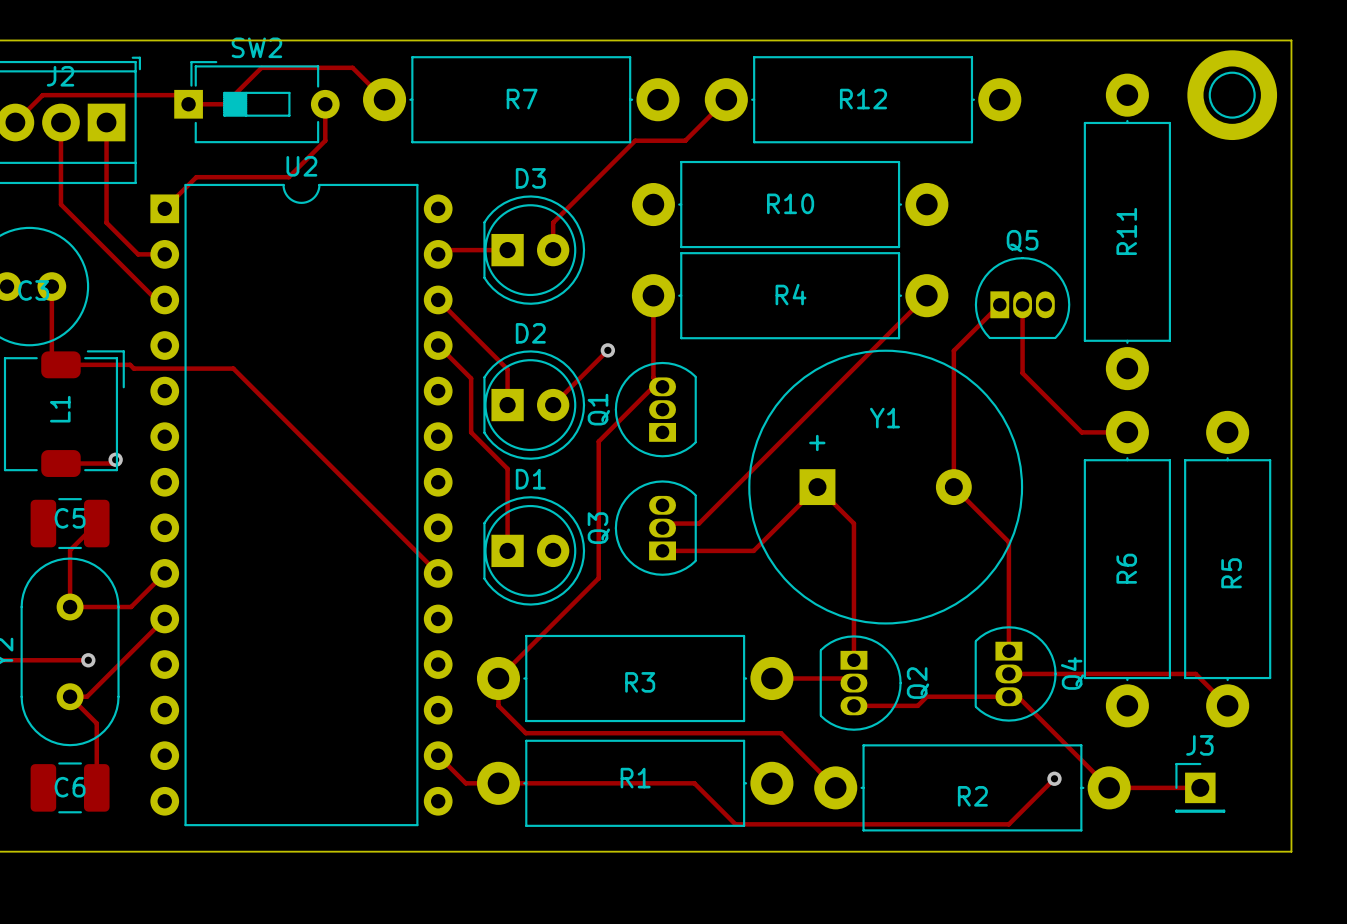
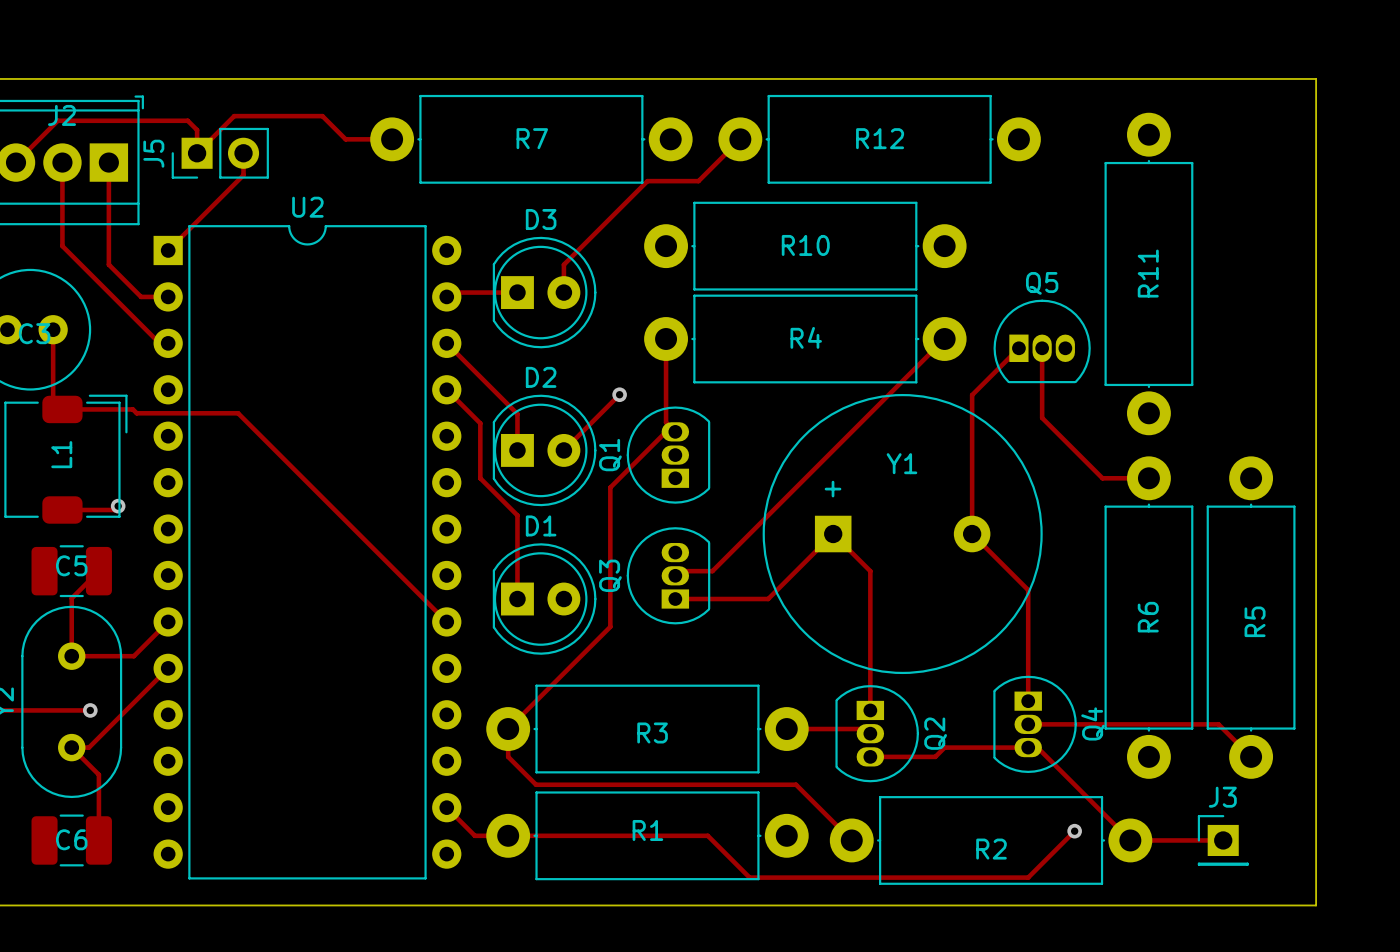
track: (42, 95) (179, 95) (188, 104) (225, 104) (261, 67) (352, 67) (384, 99) -> (43, 134) (57, 120) (187, 120) (197, 130) (197, 153) (234, 116) (322, 116) (345, 139) (392, 139)
part: (1232, 95) -> none
SW2: (256, 102) -> none
track: (325, 104) (325, 140) (288, 177) (196, 177) -> (243, 153) (243, 175) (200, 218)
J5: none -> (220, 153)

